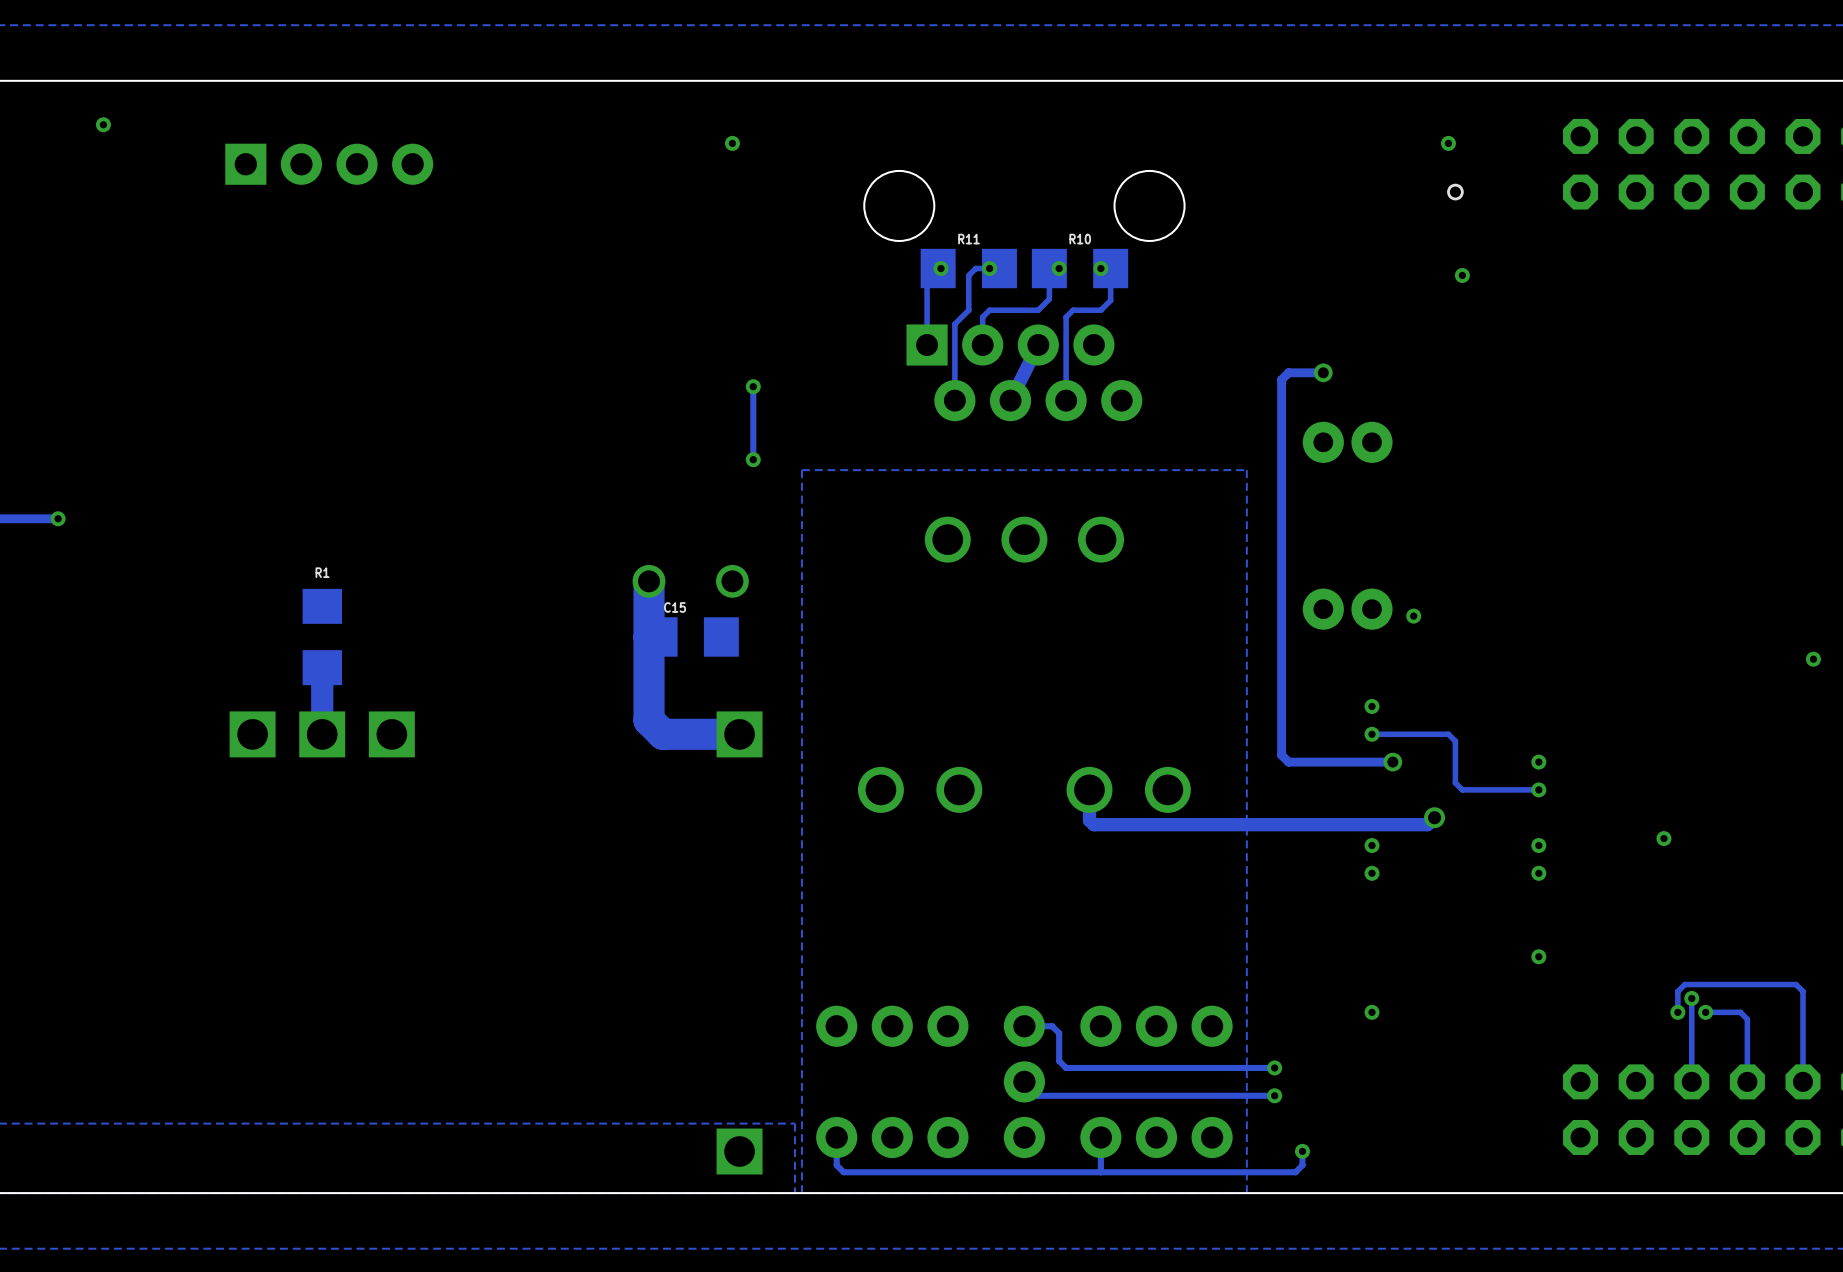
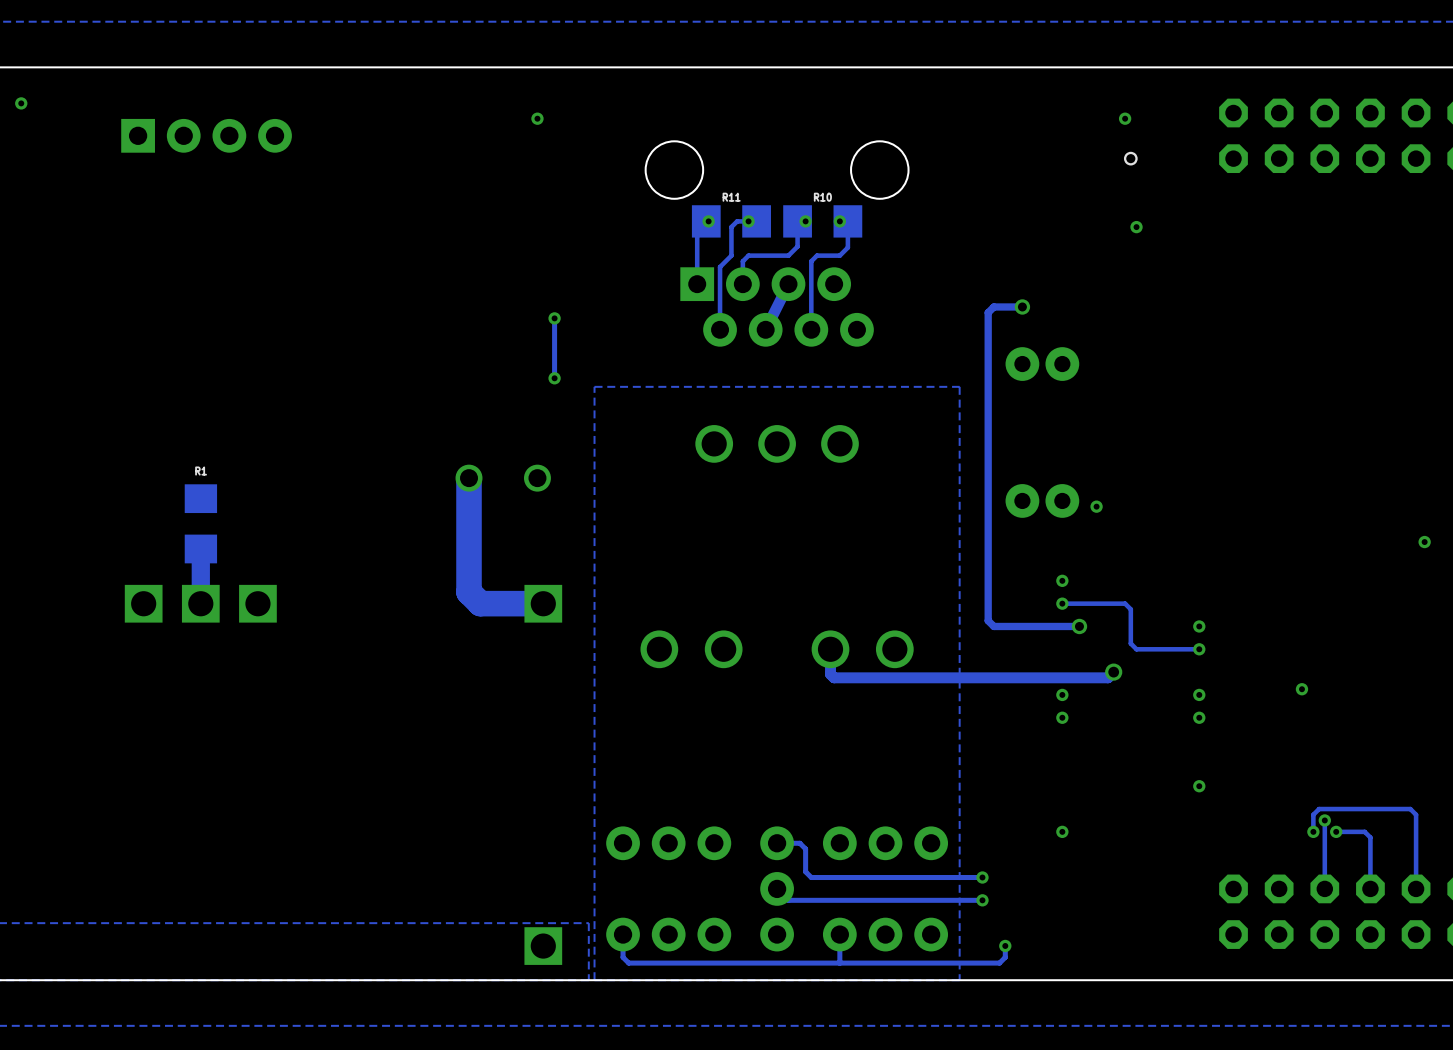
C15: (690, 636) -> none

